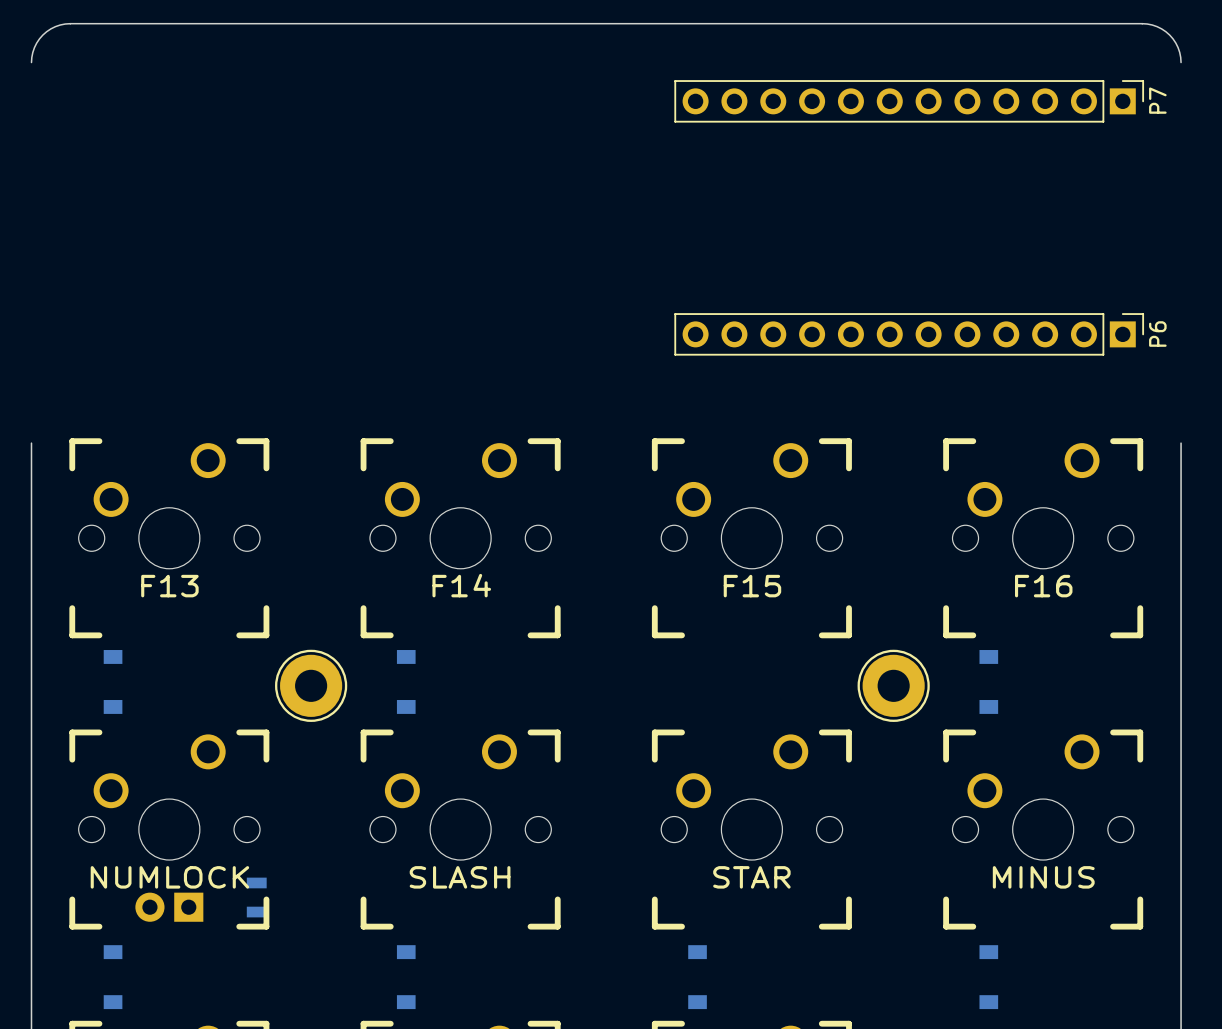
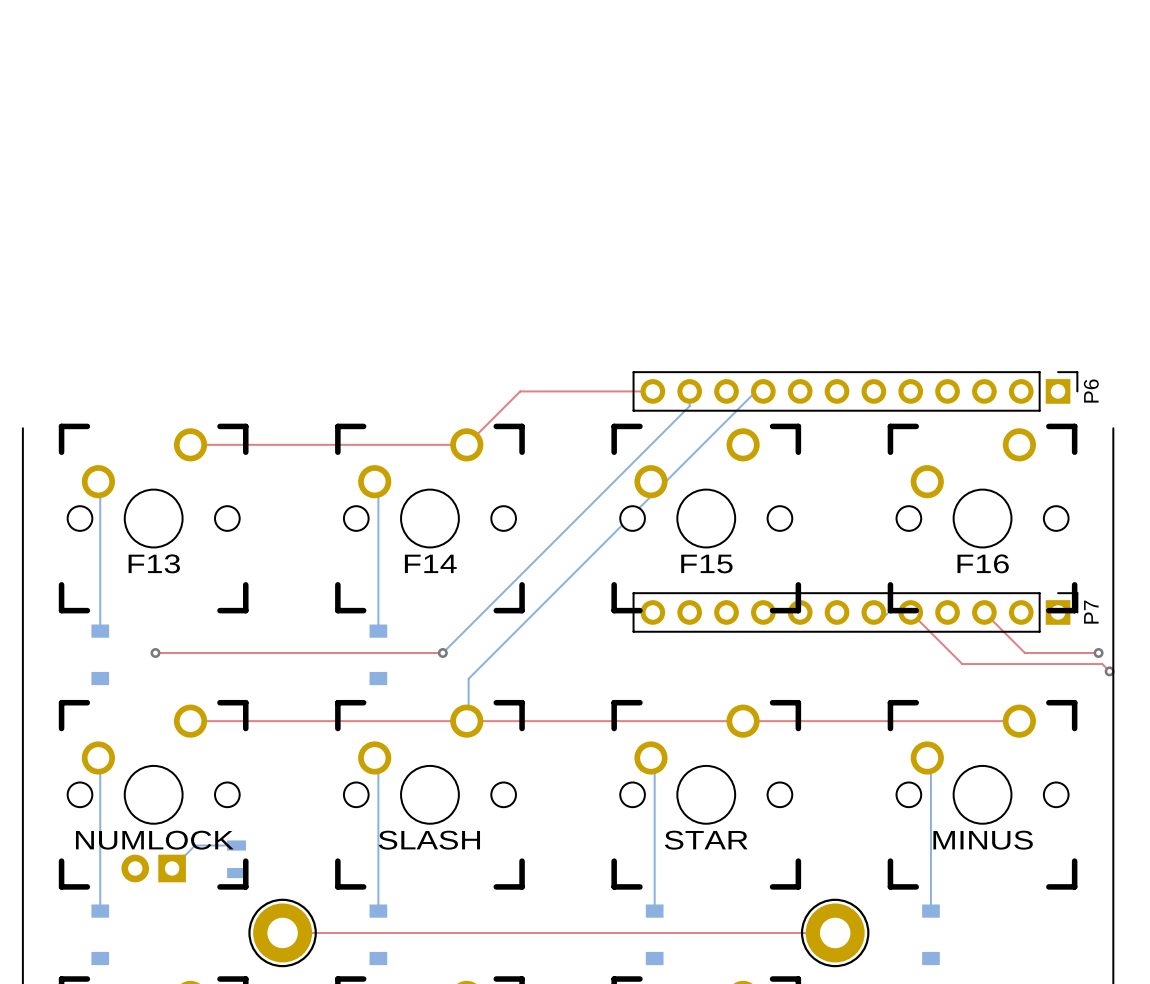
board edge: (31, 62) (34, 47) (42, 35) (55, 26) (70, 23) (1142, 23) (1157, 26) (1169, 35) (1178, 47) (1181, 62) -> none
P7 position: (909, 101) -> (855, 612)
P6 position: (909, 334) -> (855, 391)
top track: none -> (652, 391) (520, 391) (466, 444) (190, 444)
bottom track: none -> (689, 391) (689, 406) (442, 652)
bottom track: none -> (763, 391) (755, 391) (468, 678) (468, 719) (466, 721)
bottom track: none -> (98, 481) (100, 483) (100, 631)
bottom track: none -> (374, 481) (378, 485) (378, 631)
bottom track: none -> (888, 612) (884, 616)
top track: none -> (910, 612) (962, 664) (1102, 664) (1109, 671)
top track: none -> (984, 612) (1024, 652) (1098, 652)
top track: none -> (155, 652) (442, 652)
via: none -> (155, 652)
via: none -> (442, 652)
via: none -> (1098, 652)
part: (988, 681) -> none
part position: (311, 685) -> (282, 932)
part position: (893, 685) -> (835, 932)
via: none -> (1109, 671)
top track: none -> (190, 721) (1019, 721)
bottom track: none -> (98, 757) (100, 759) (100, 911)
bottom track: none -> (374, 757) (378, 761) (378, 911)
bottom track: none -> (650, 757) (654, 761) (654, 911)
bottom track: none -> (927, 757) (930, 761) (930, 911)
bottom track: none -> (236, 845) (195, 845) (172, 868)
top track: none -> (282, 932) (835, 932)

